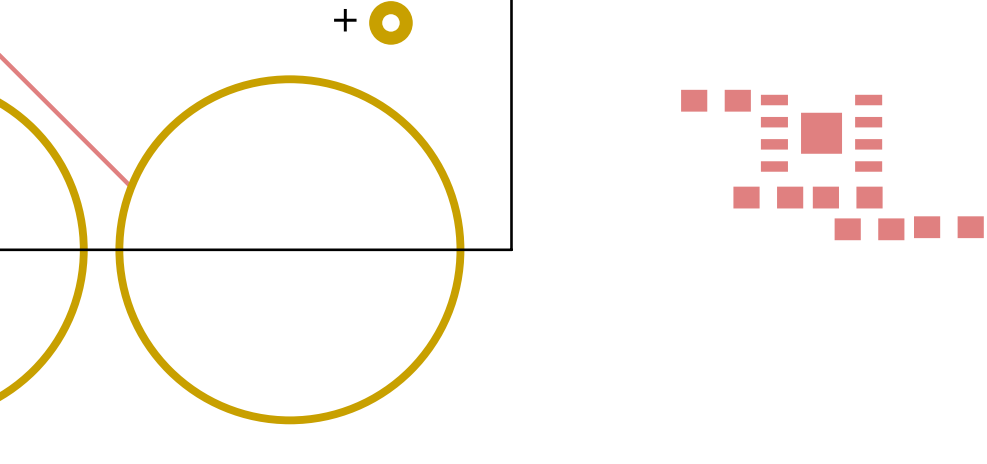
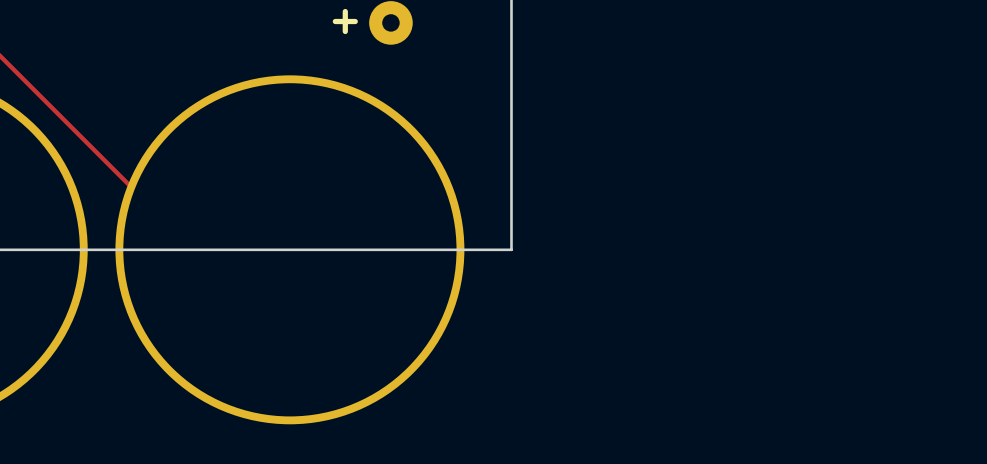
part: (715, 100) -> none
part: (821, 133) -> none
part: (768, 197) -> none
part: (847, 197) -> none
part: (948, 227) -> none
part: (869, 229) -> none

